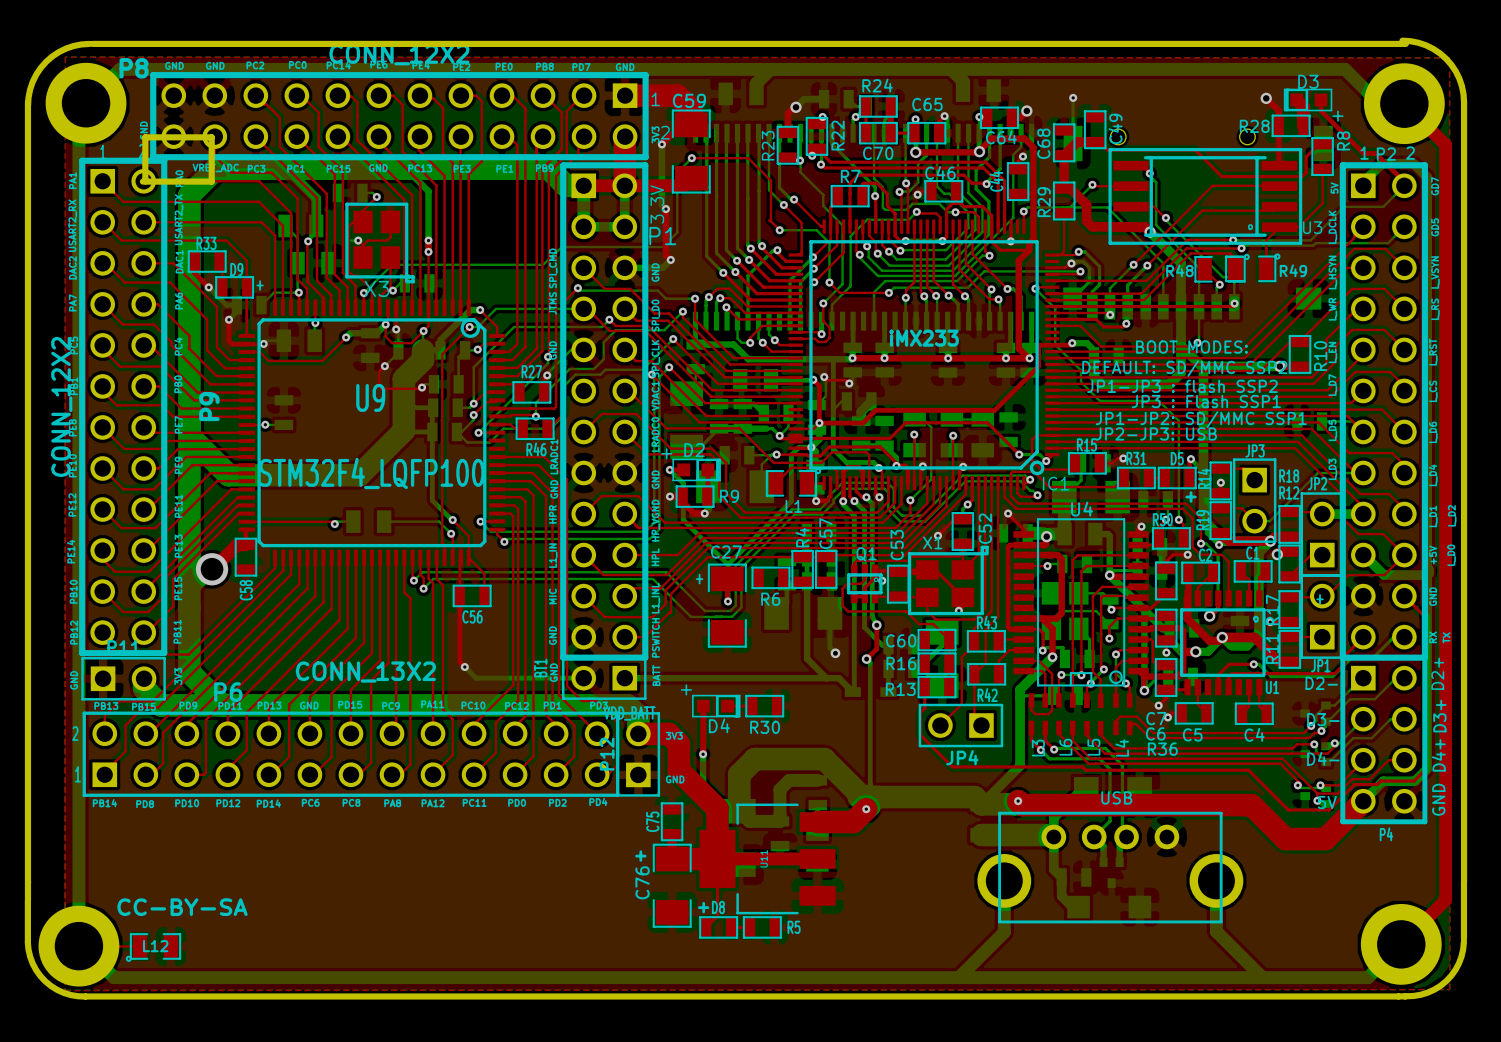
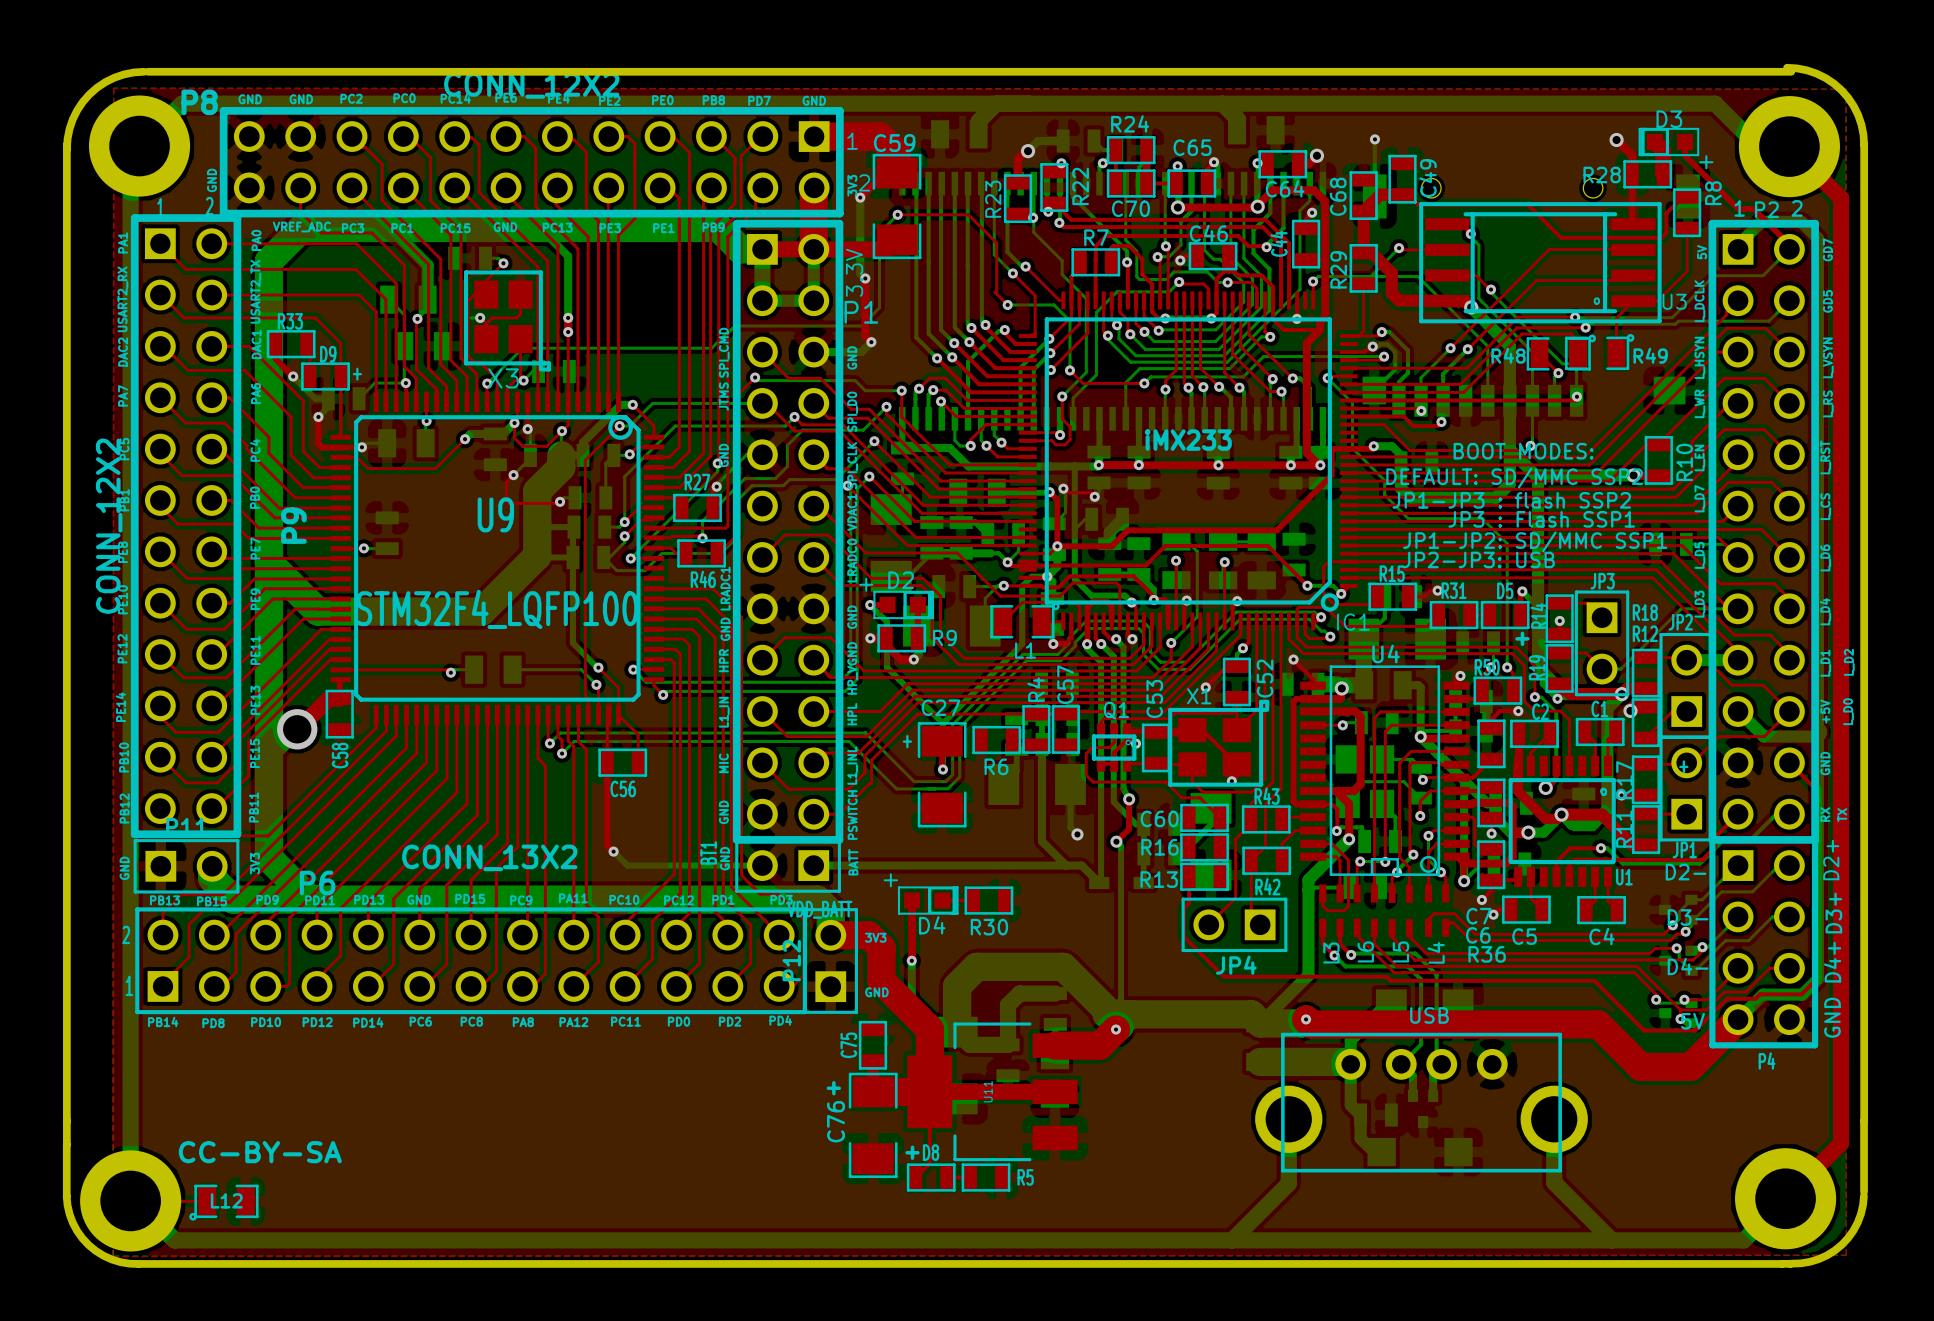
board edge: (145, 181) (145, 137) (211, 137) (211, 181) (142, 181) -> none

